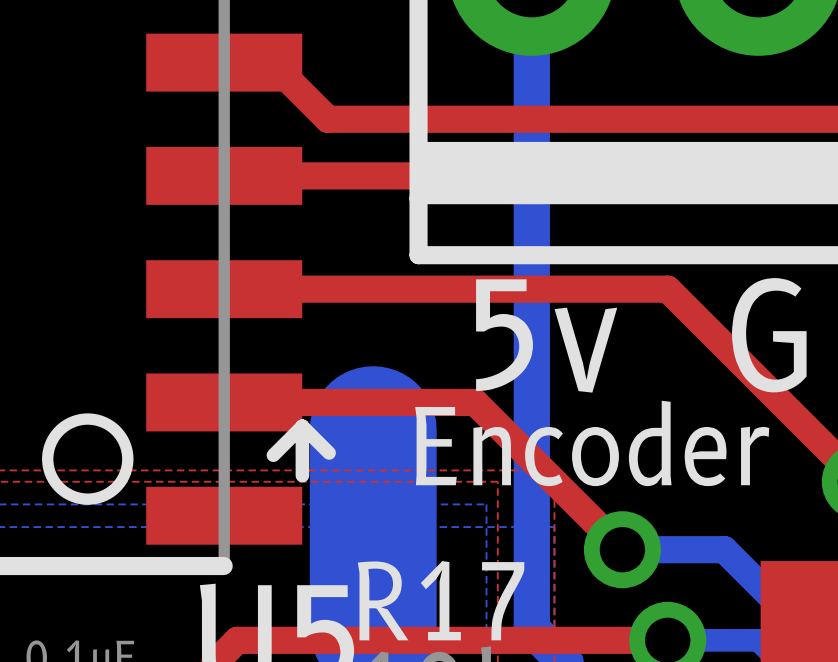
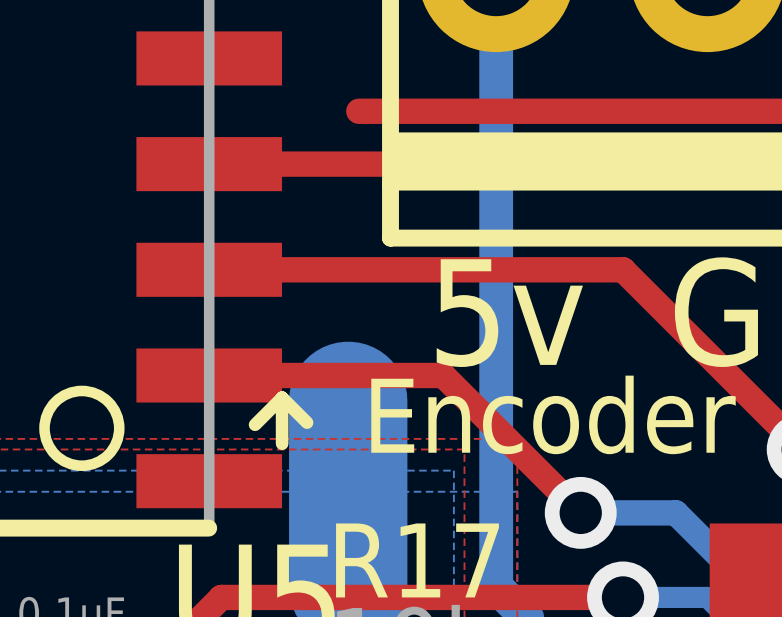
top track: (224, 62) (271, 62) (327, 119) (384, 119) -> none

